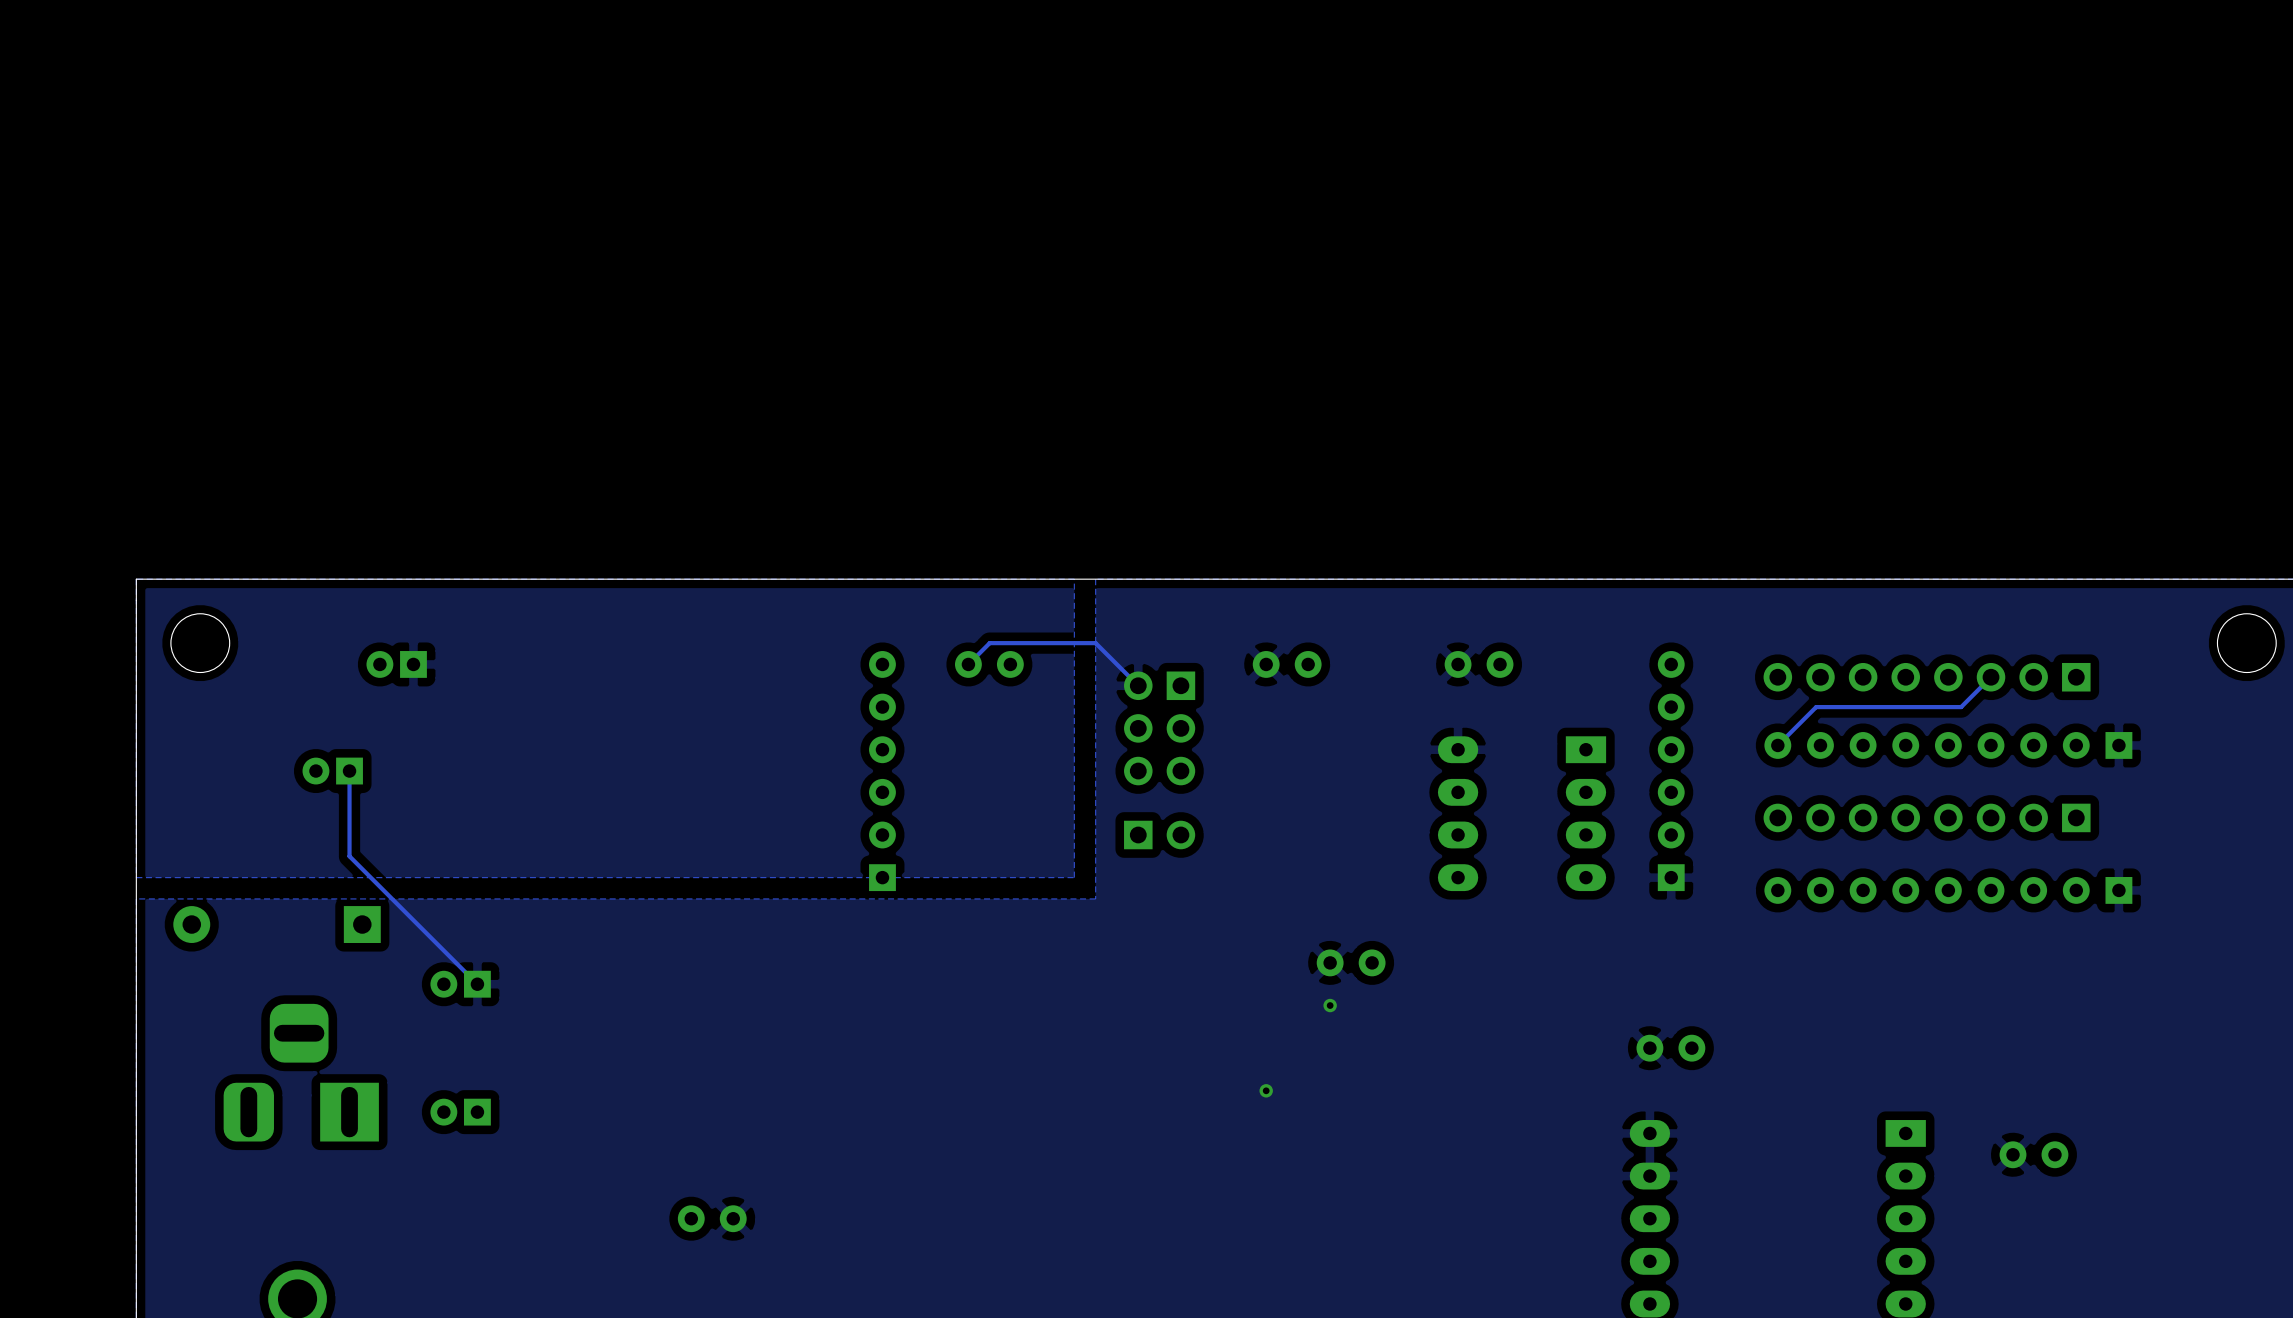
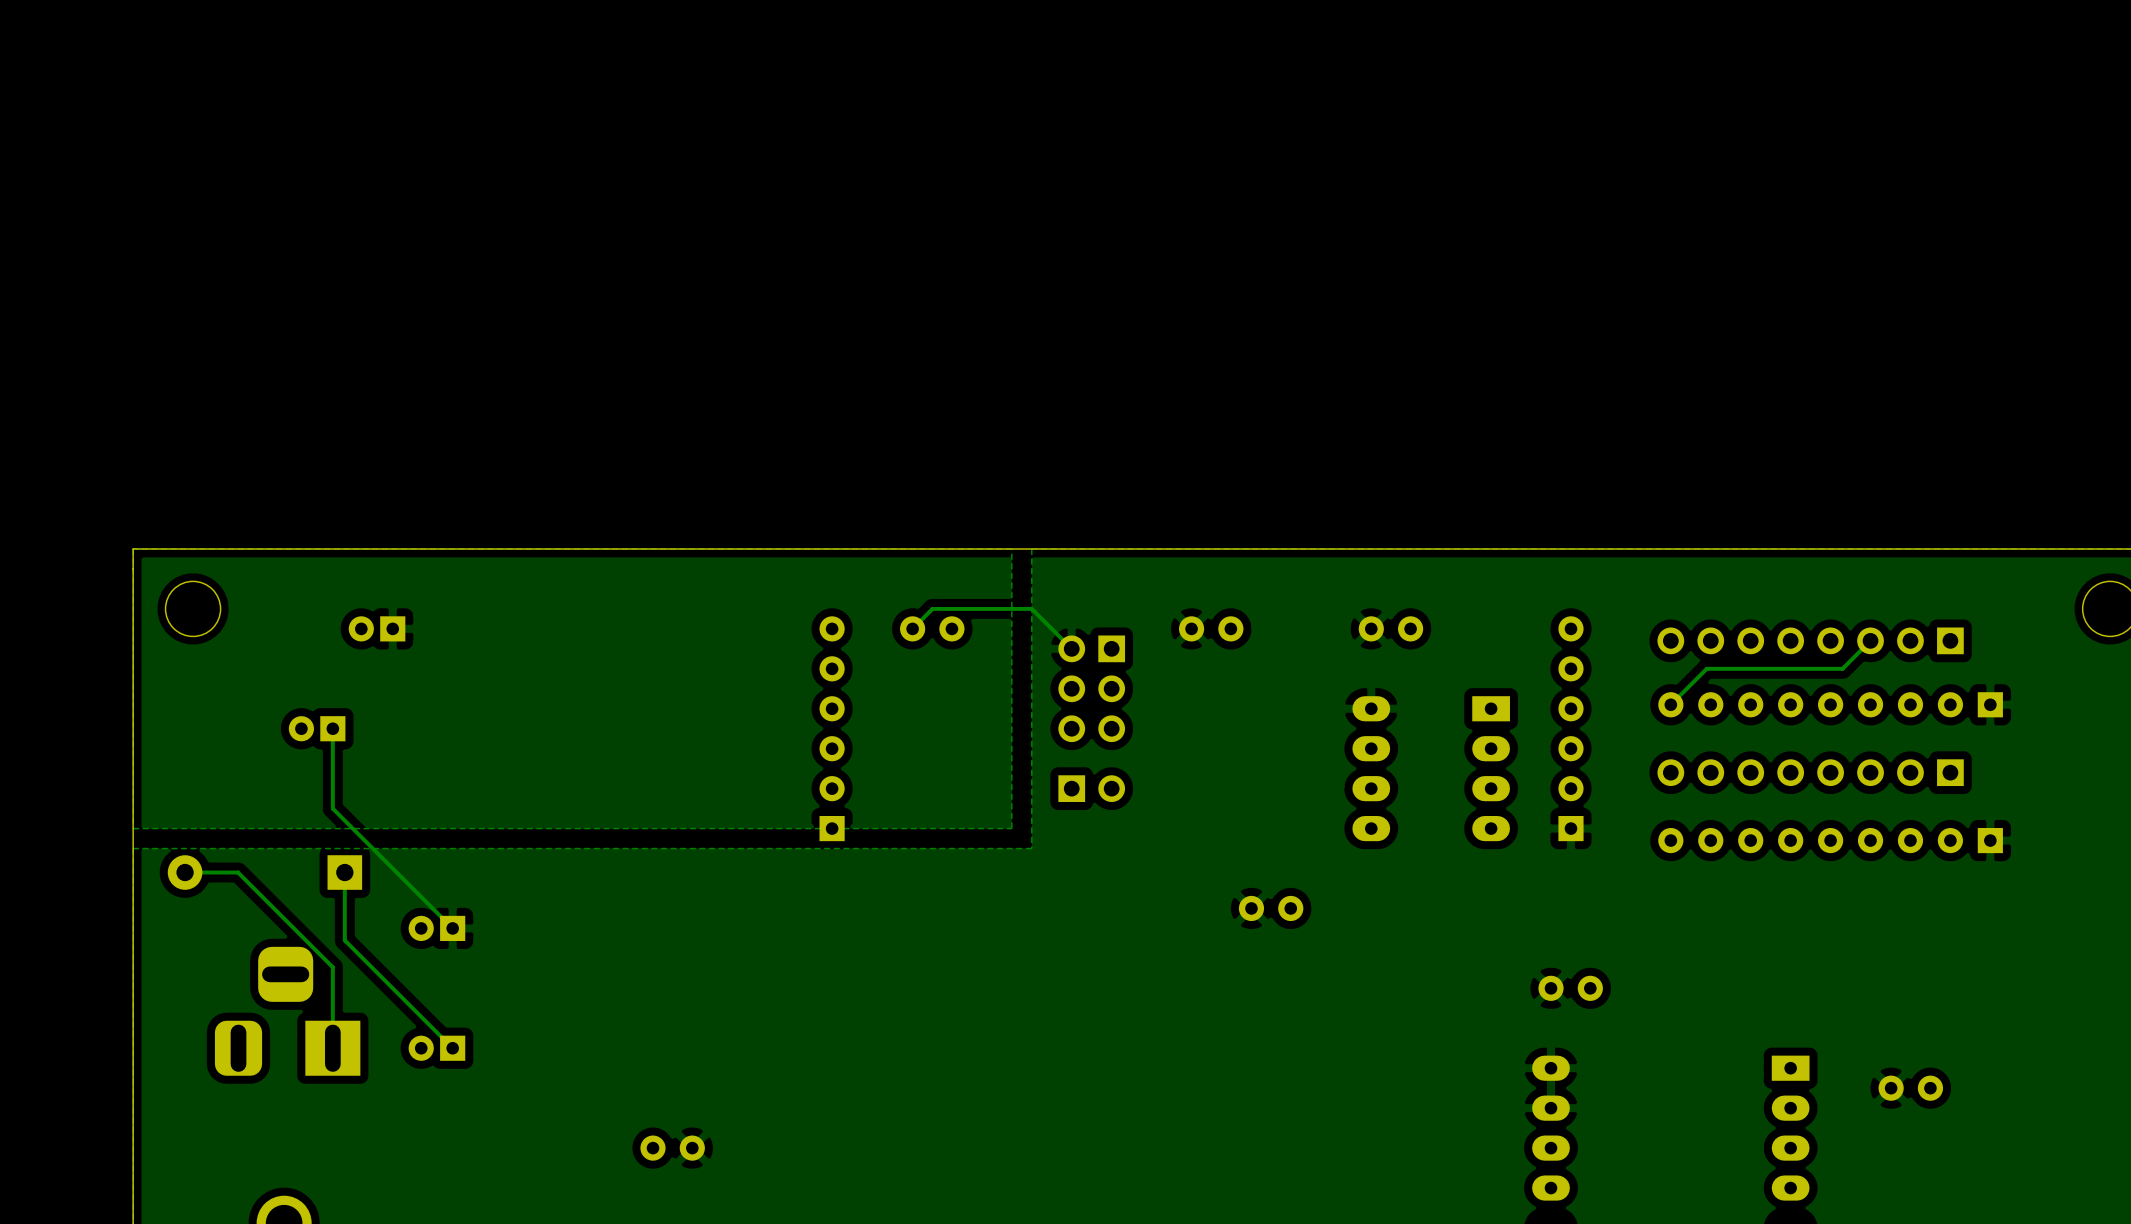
track: none -> (185, 872) (238, 872) (332, 967) (332, 1048)
track: none -> (344, 872) (344, 940) (452, 1048)
via: (1330, 1005) -> none
via: (1266, 1090) -> none

